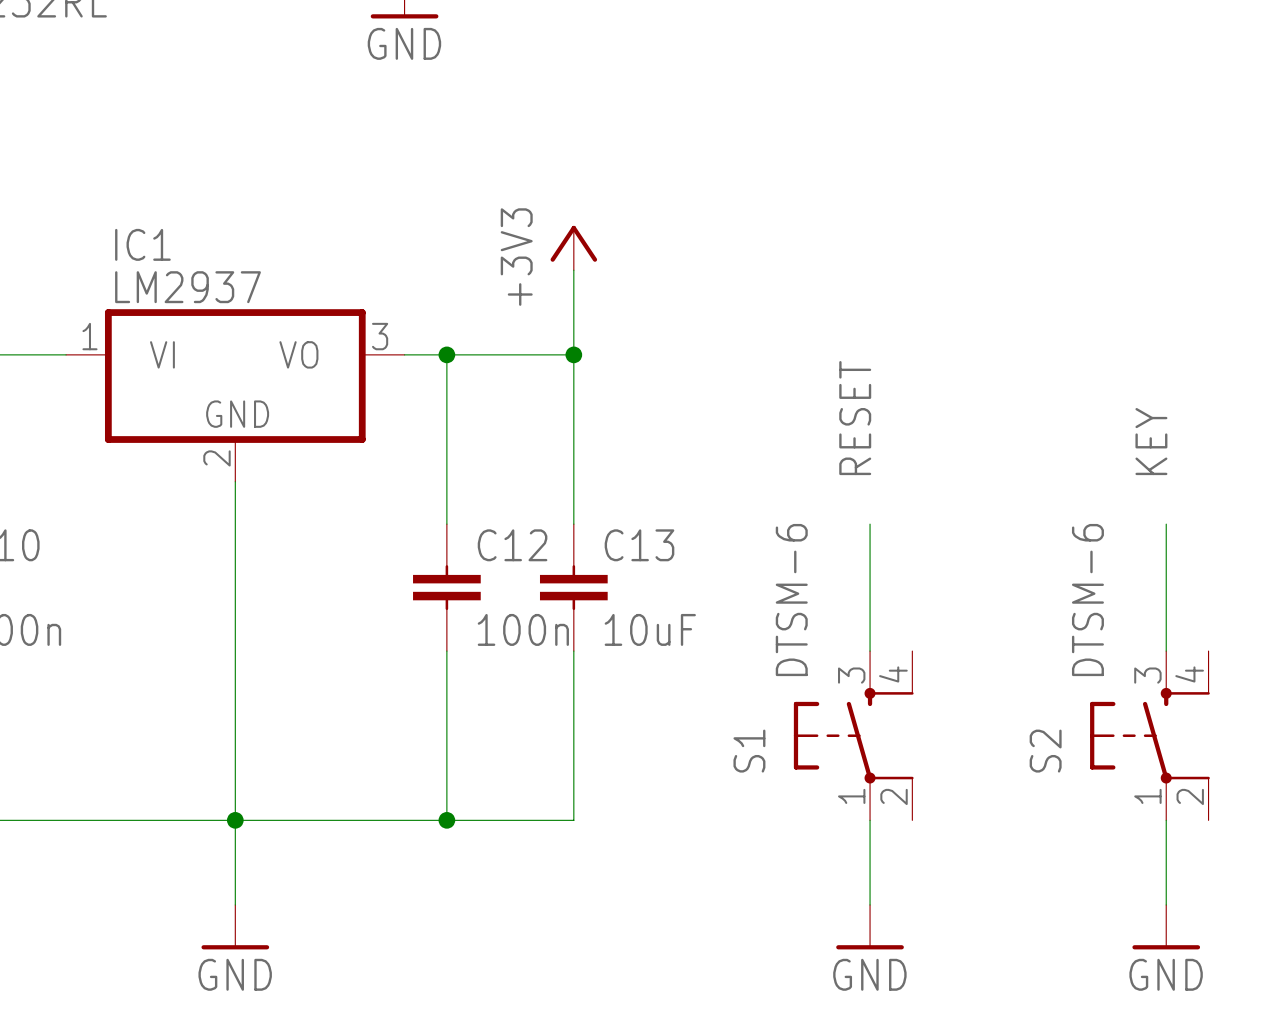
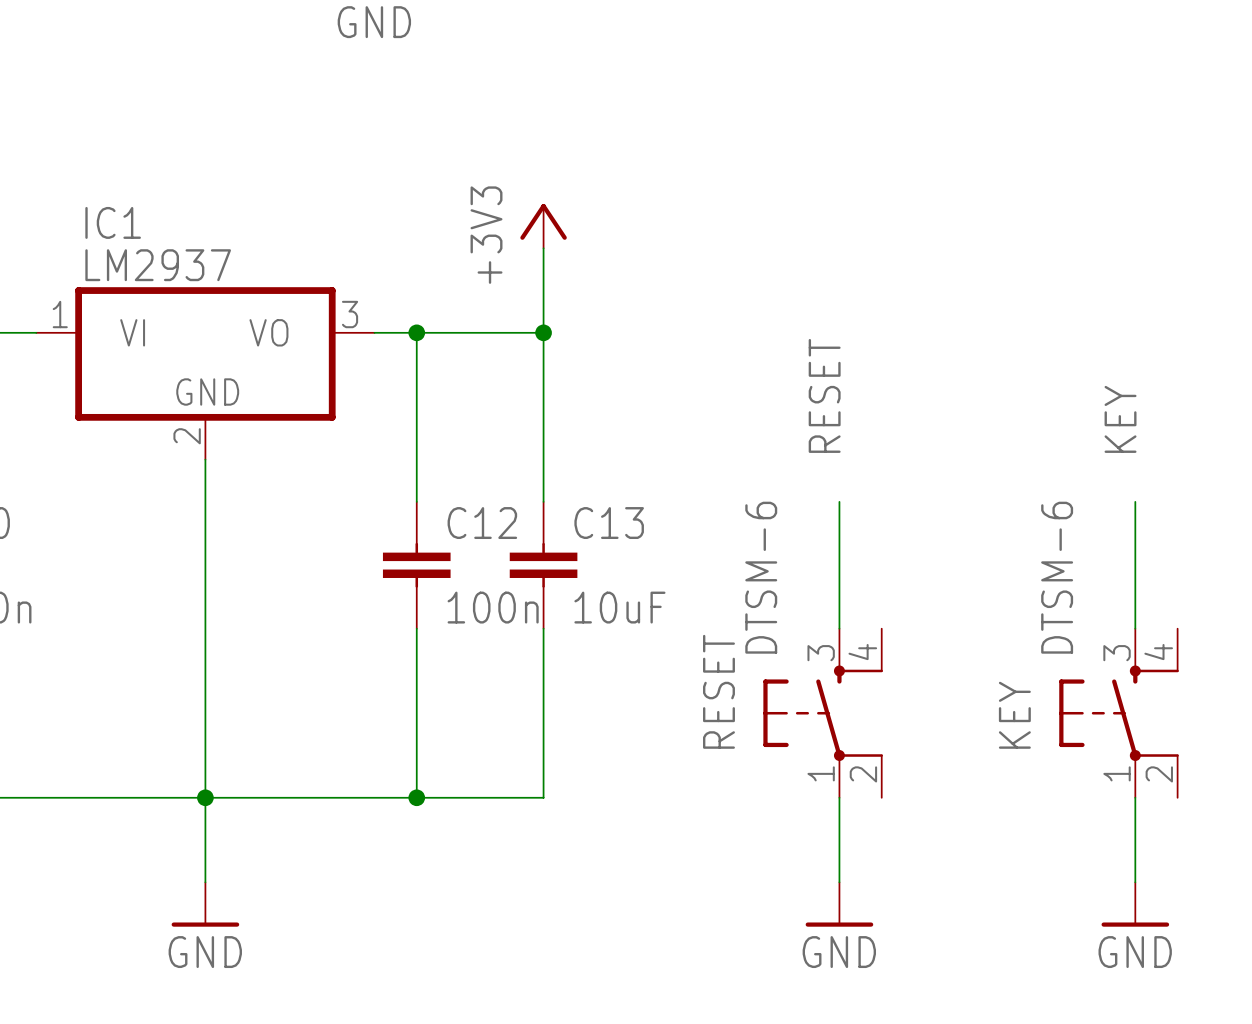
S1 name: S1 (749, 751) -> RESET (718, 691)
S2 name: S2 (1045, 751) -> KEY (1014, 715)

